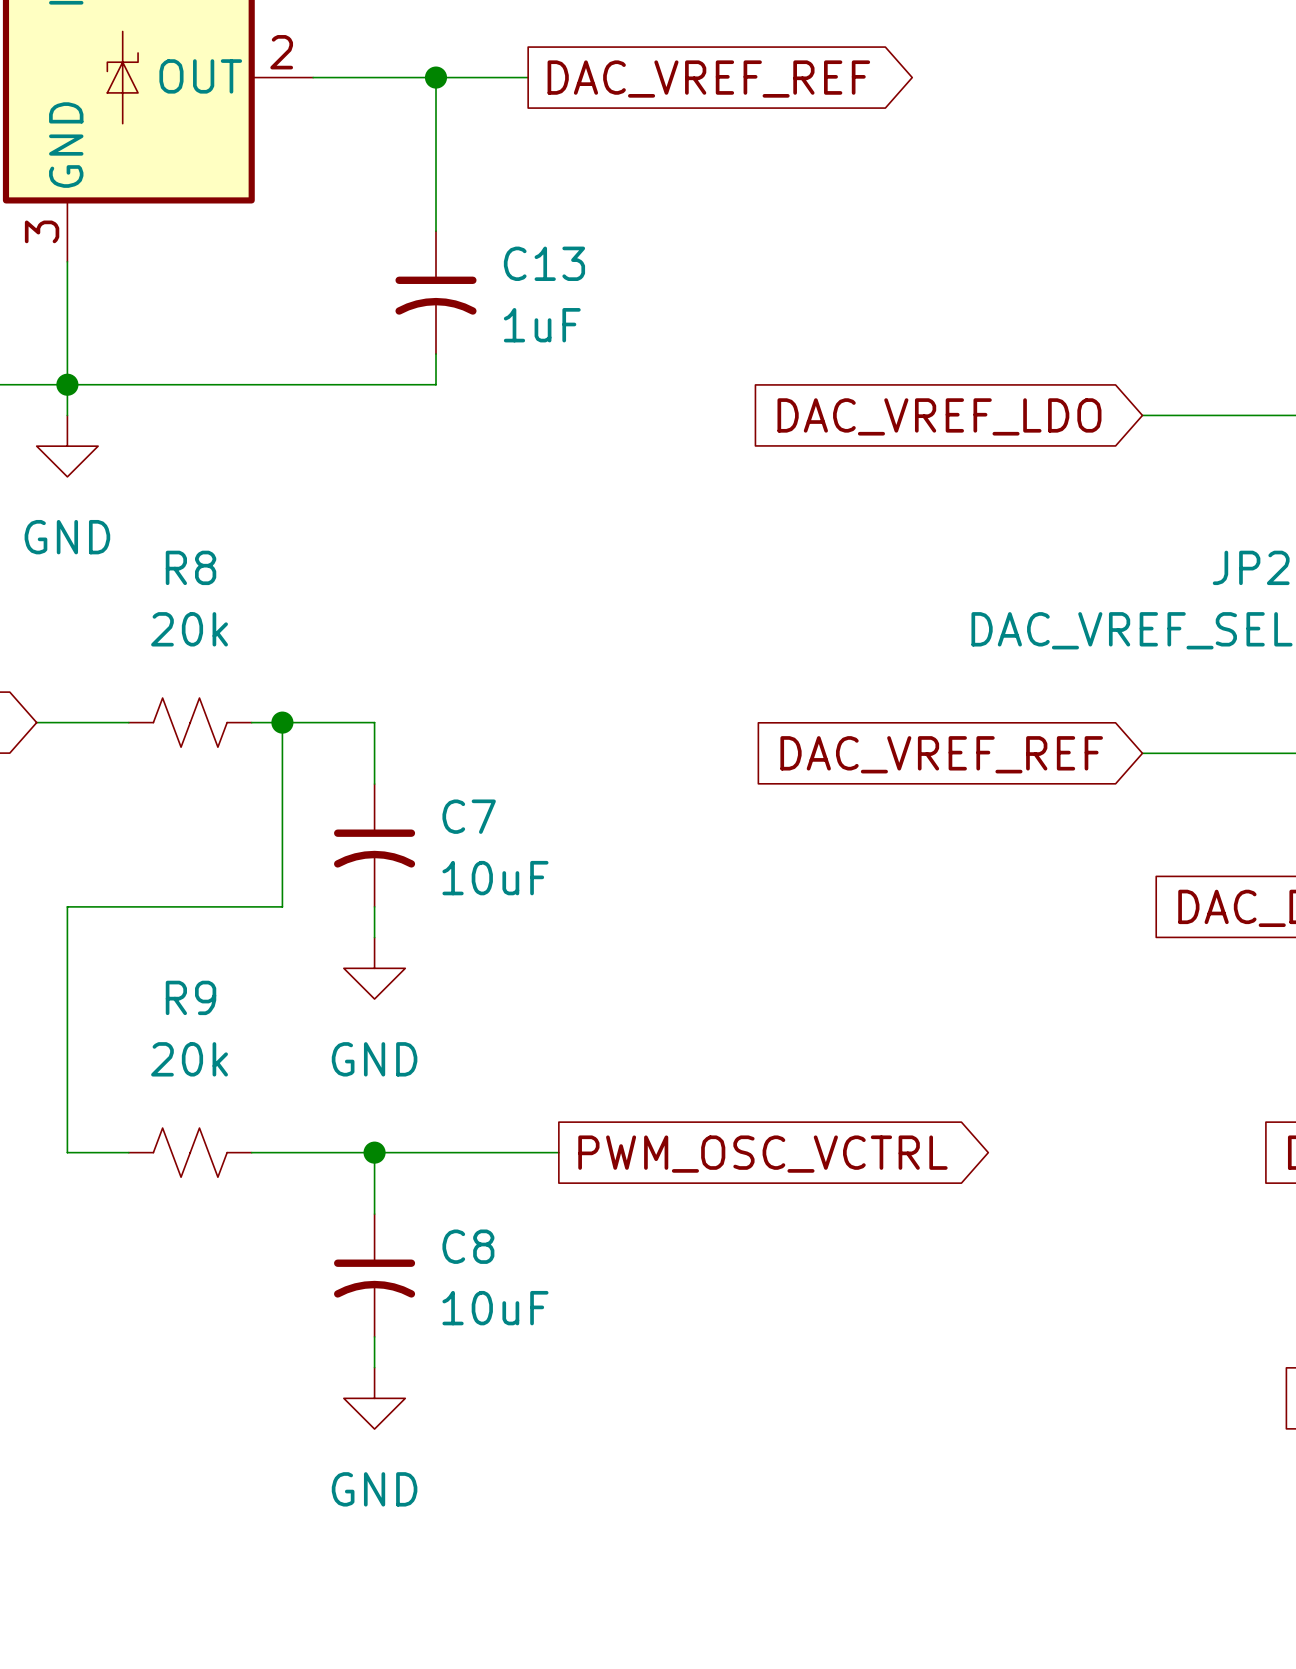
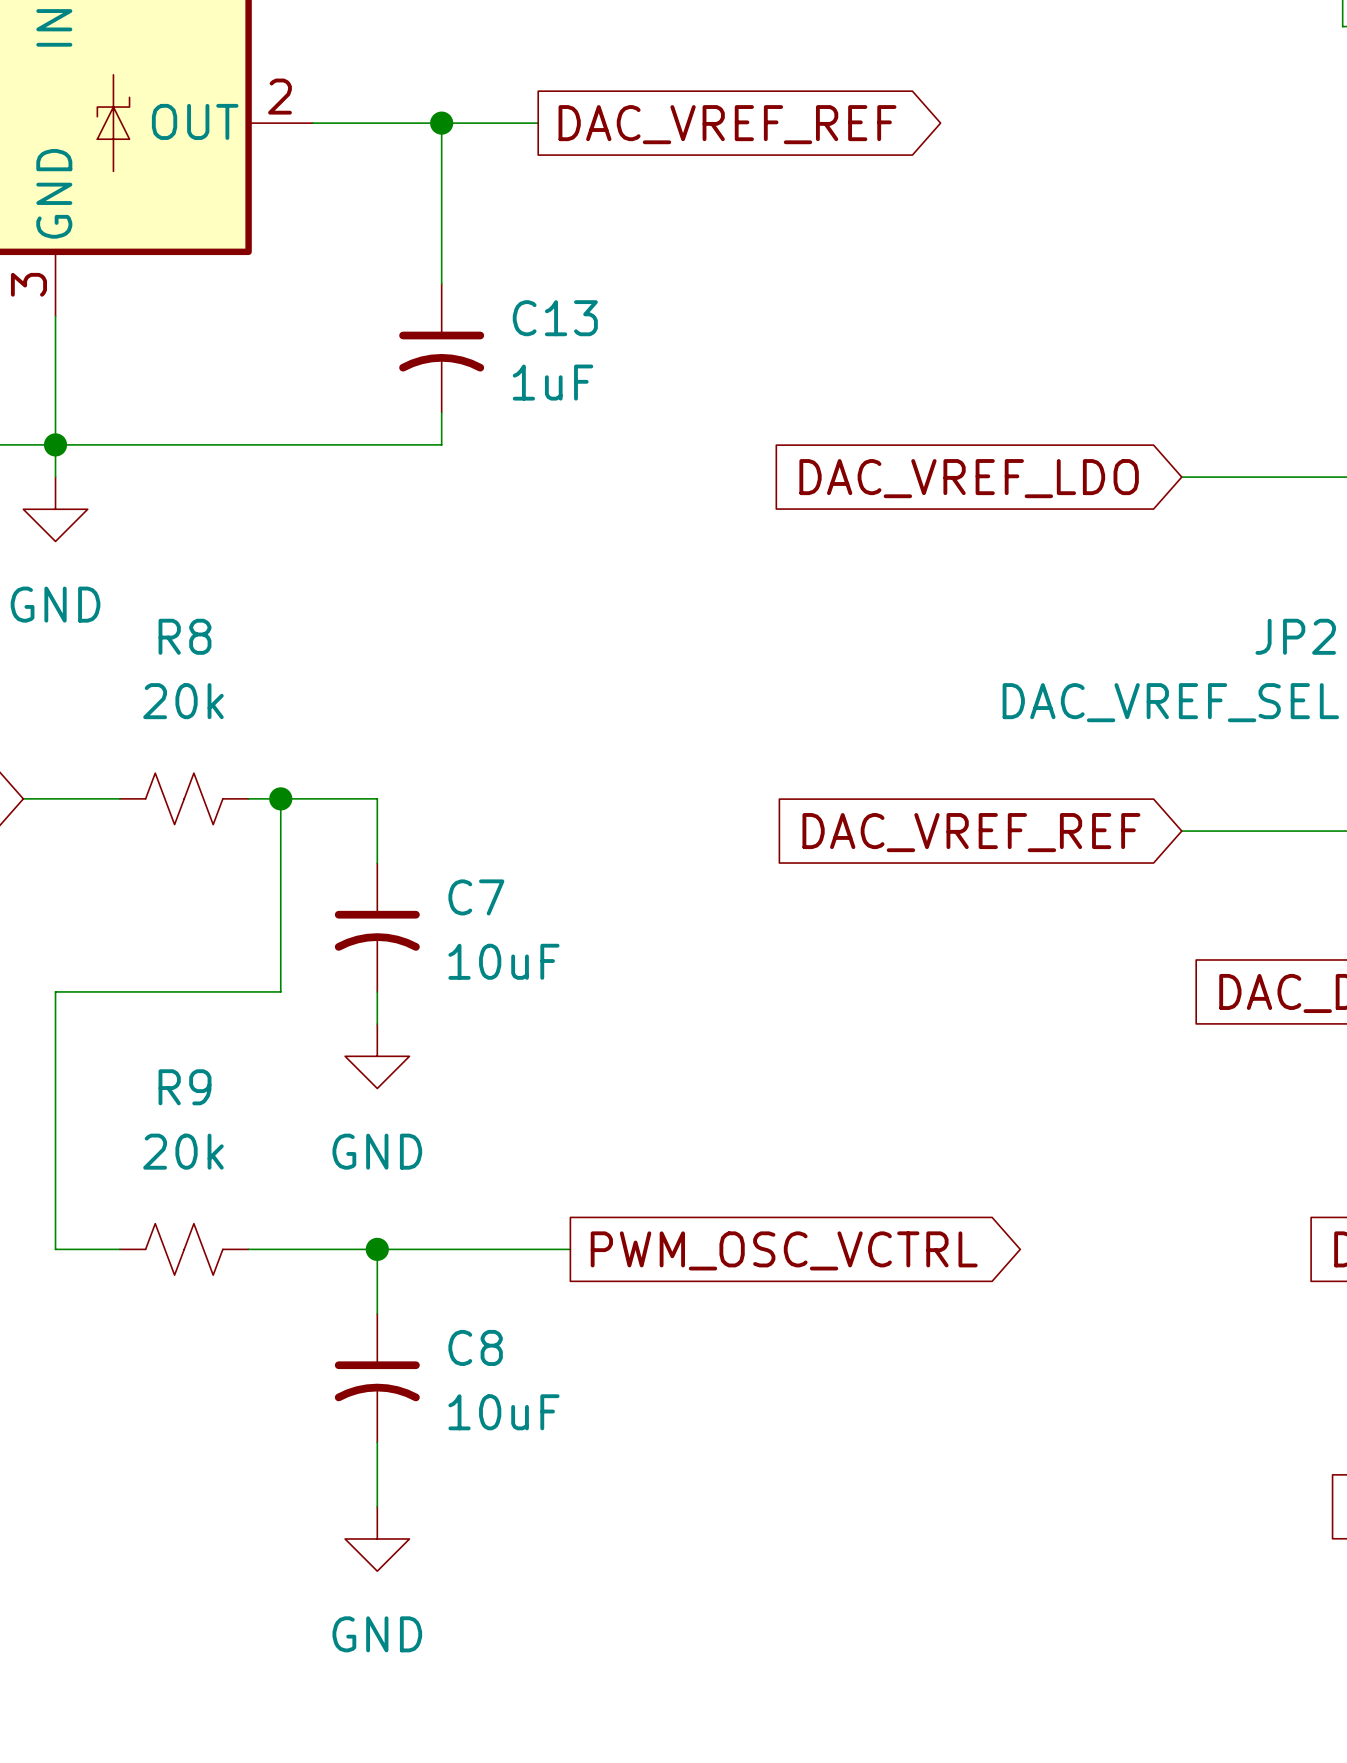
power symbol position: GND (374, 1398) -> GND (377, 1539)

